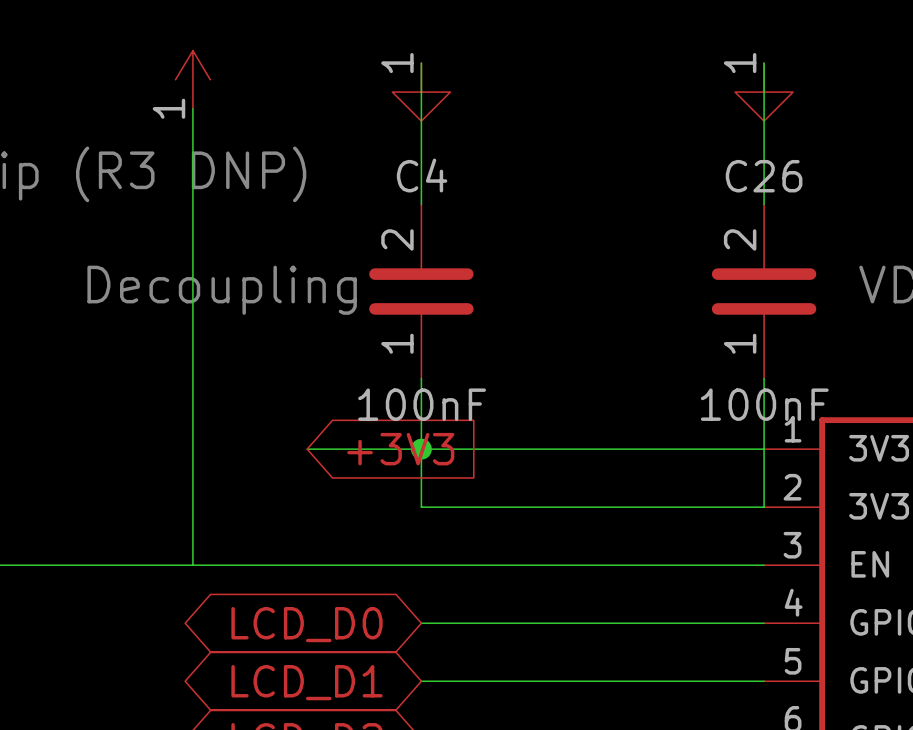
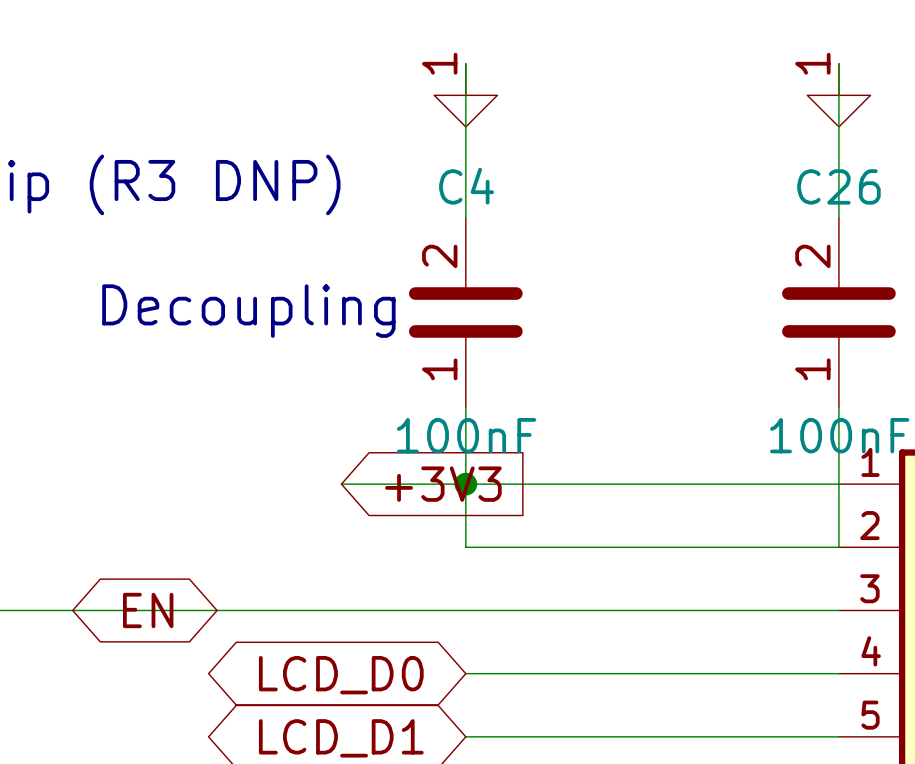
power symbol: (192, 79) -> none
wire: (192, 108) (192, 565) -> none
global label: none -> EN (148, 610)

